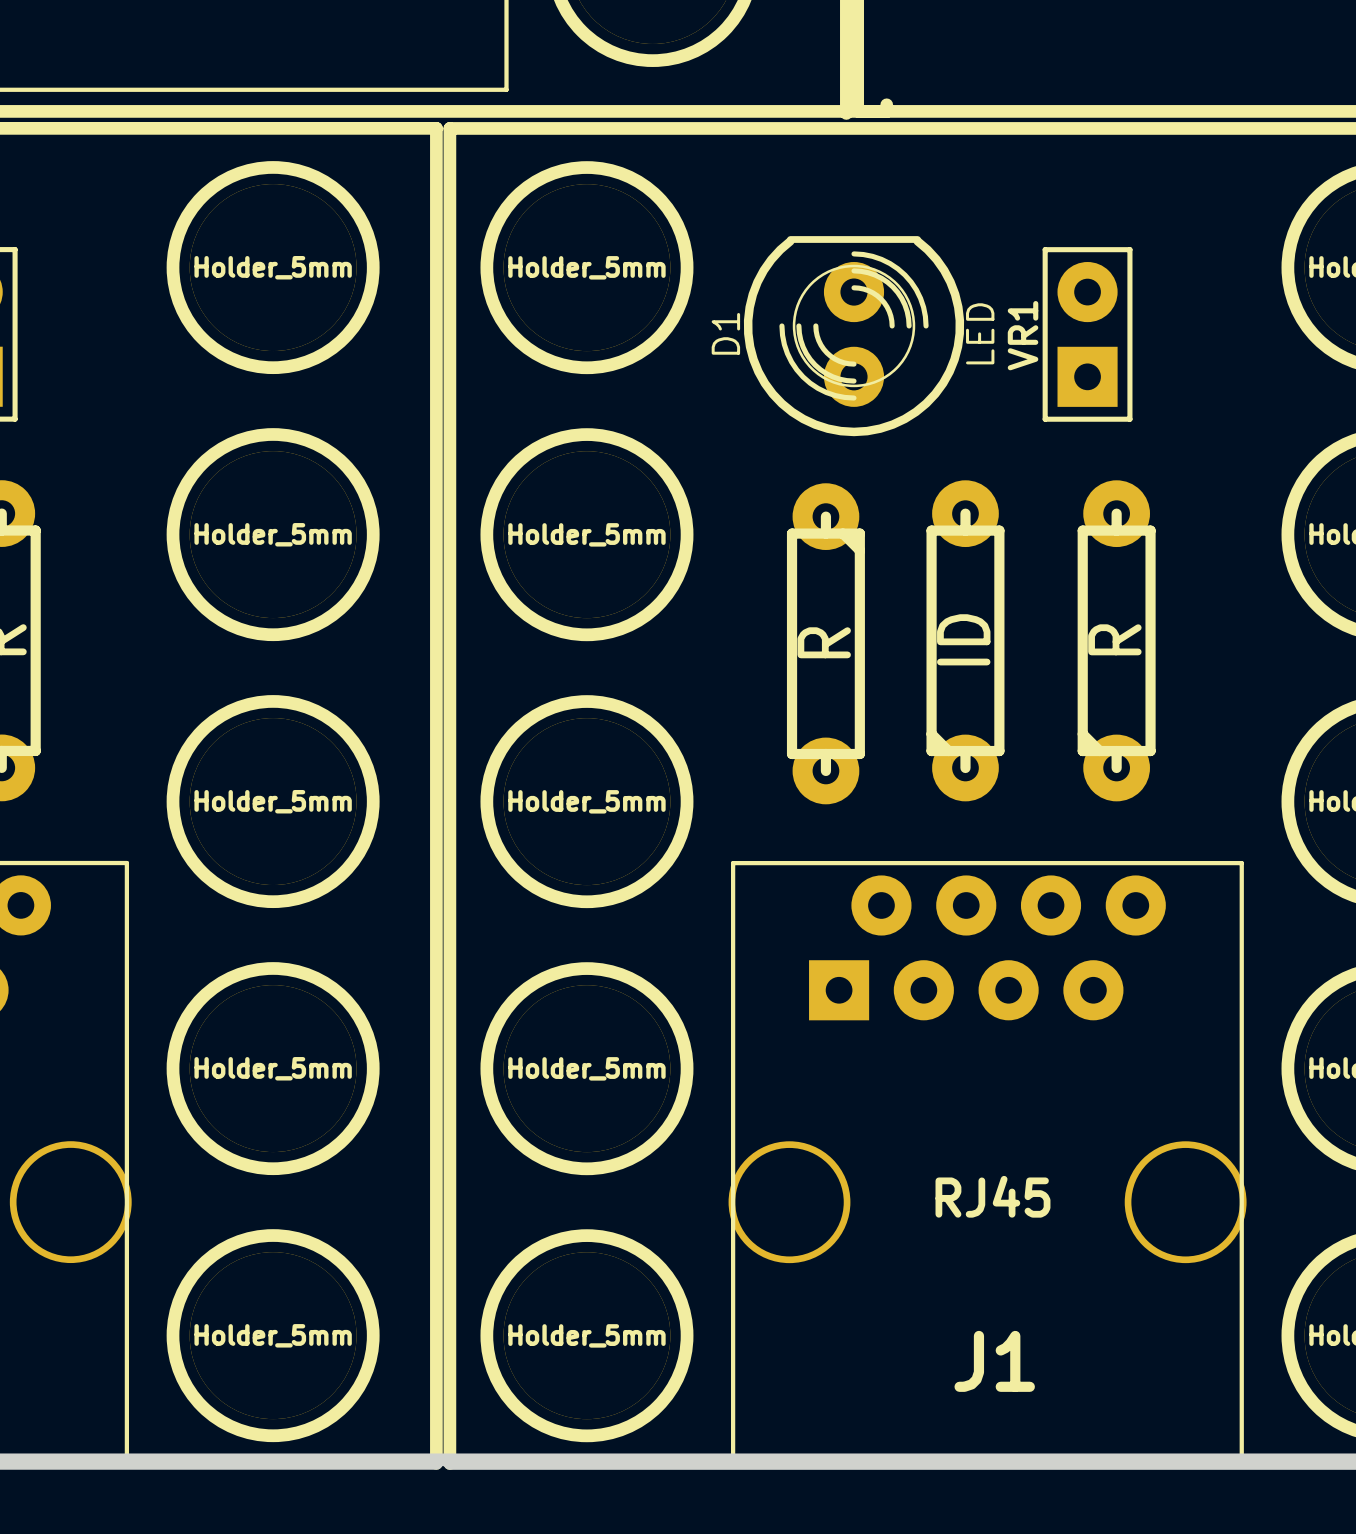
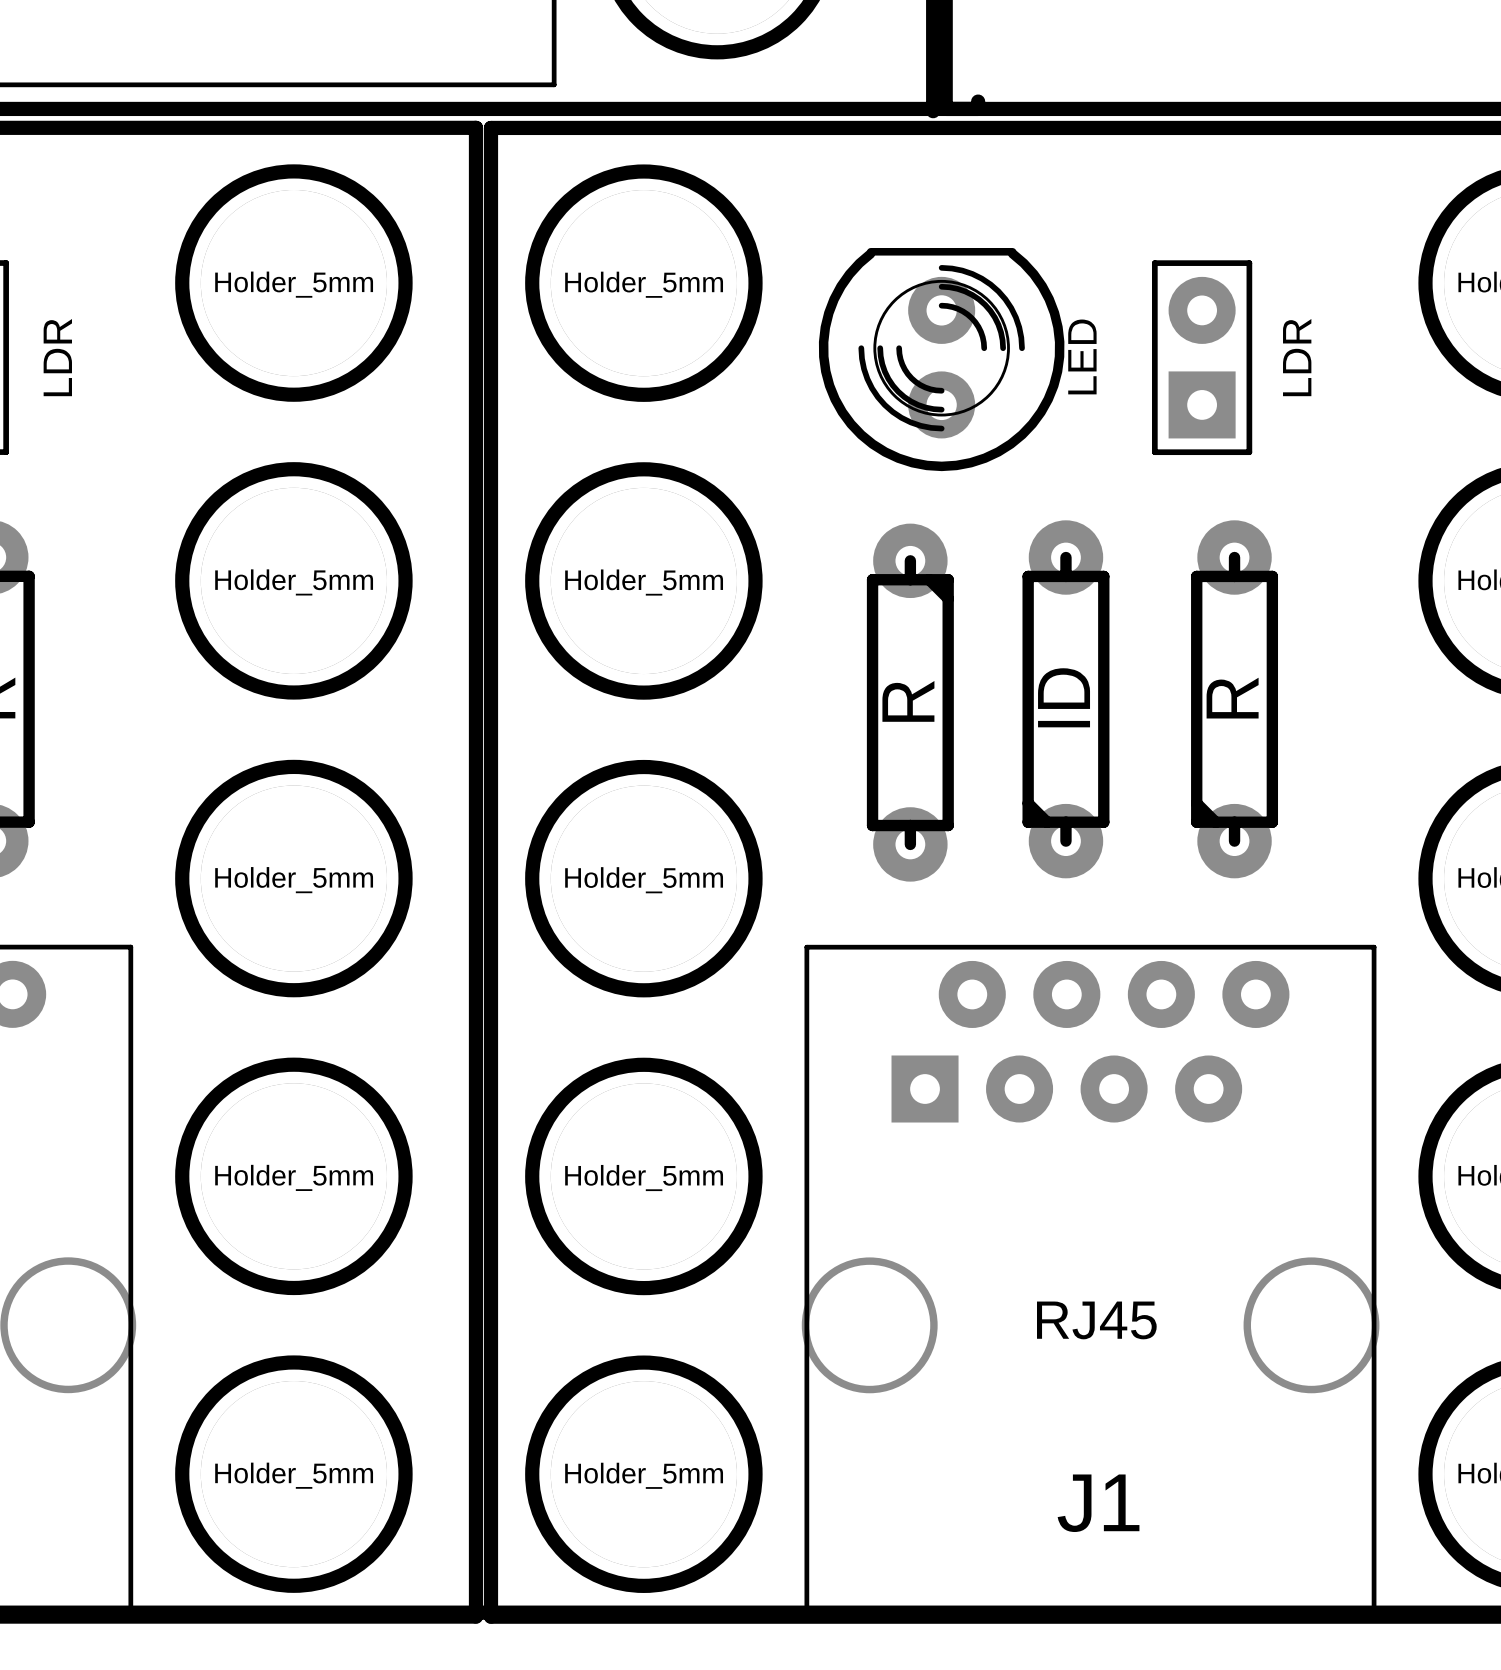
D1 name: D1 (725, 333) -> none
part value: none -> LDR (57, 357)
VR1 value: none -> LDR (1297, 357)
VR1 name: VR1 (1023, 335) -> none

